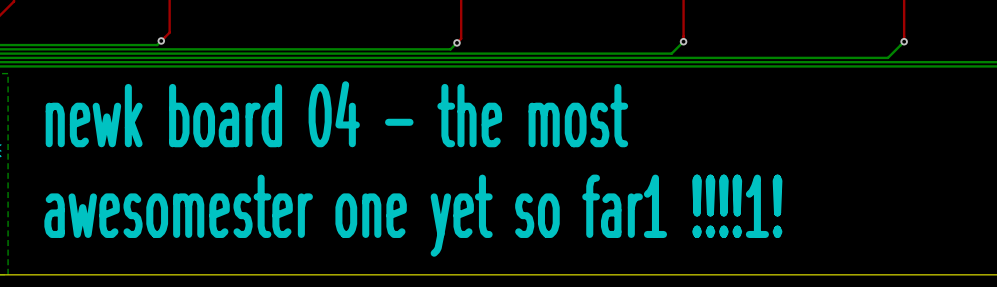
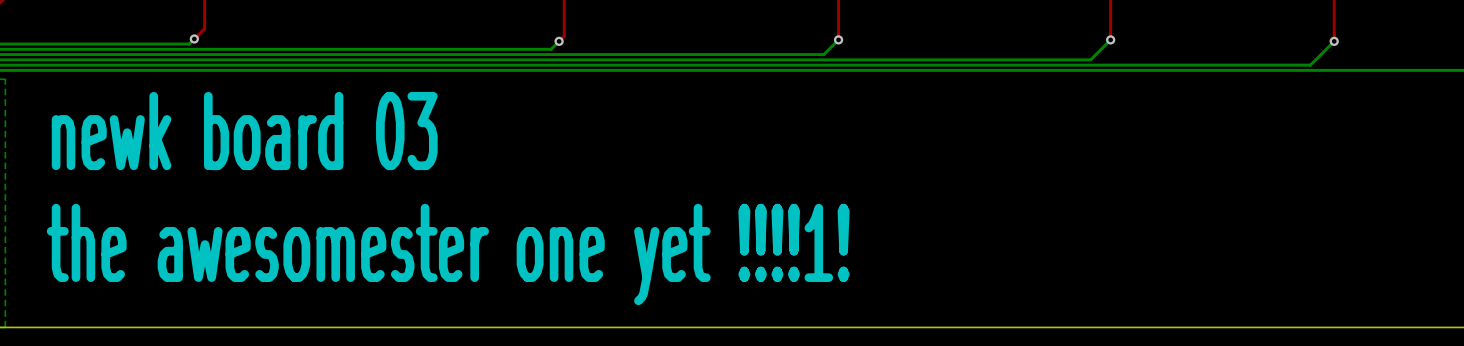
text: newk board 04 - the most (336, 114) -> newk board 03 (244, 131)
text: awesomester one yet so far1 !!!!1! (413, 215) -> the awesomester one yet !!!!1! (448, 254)

